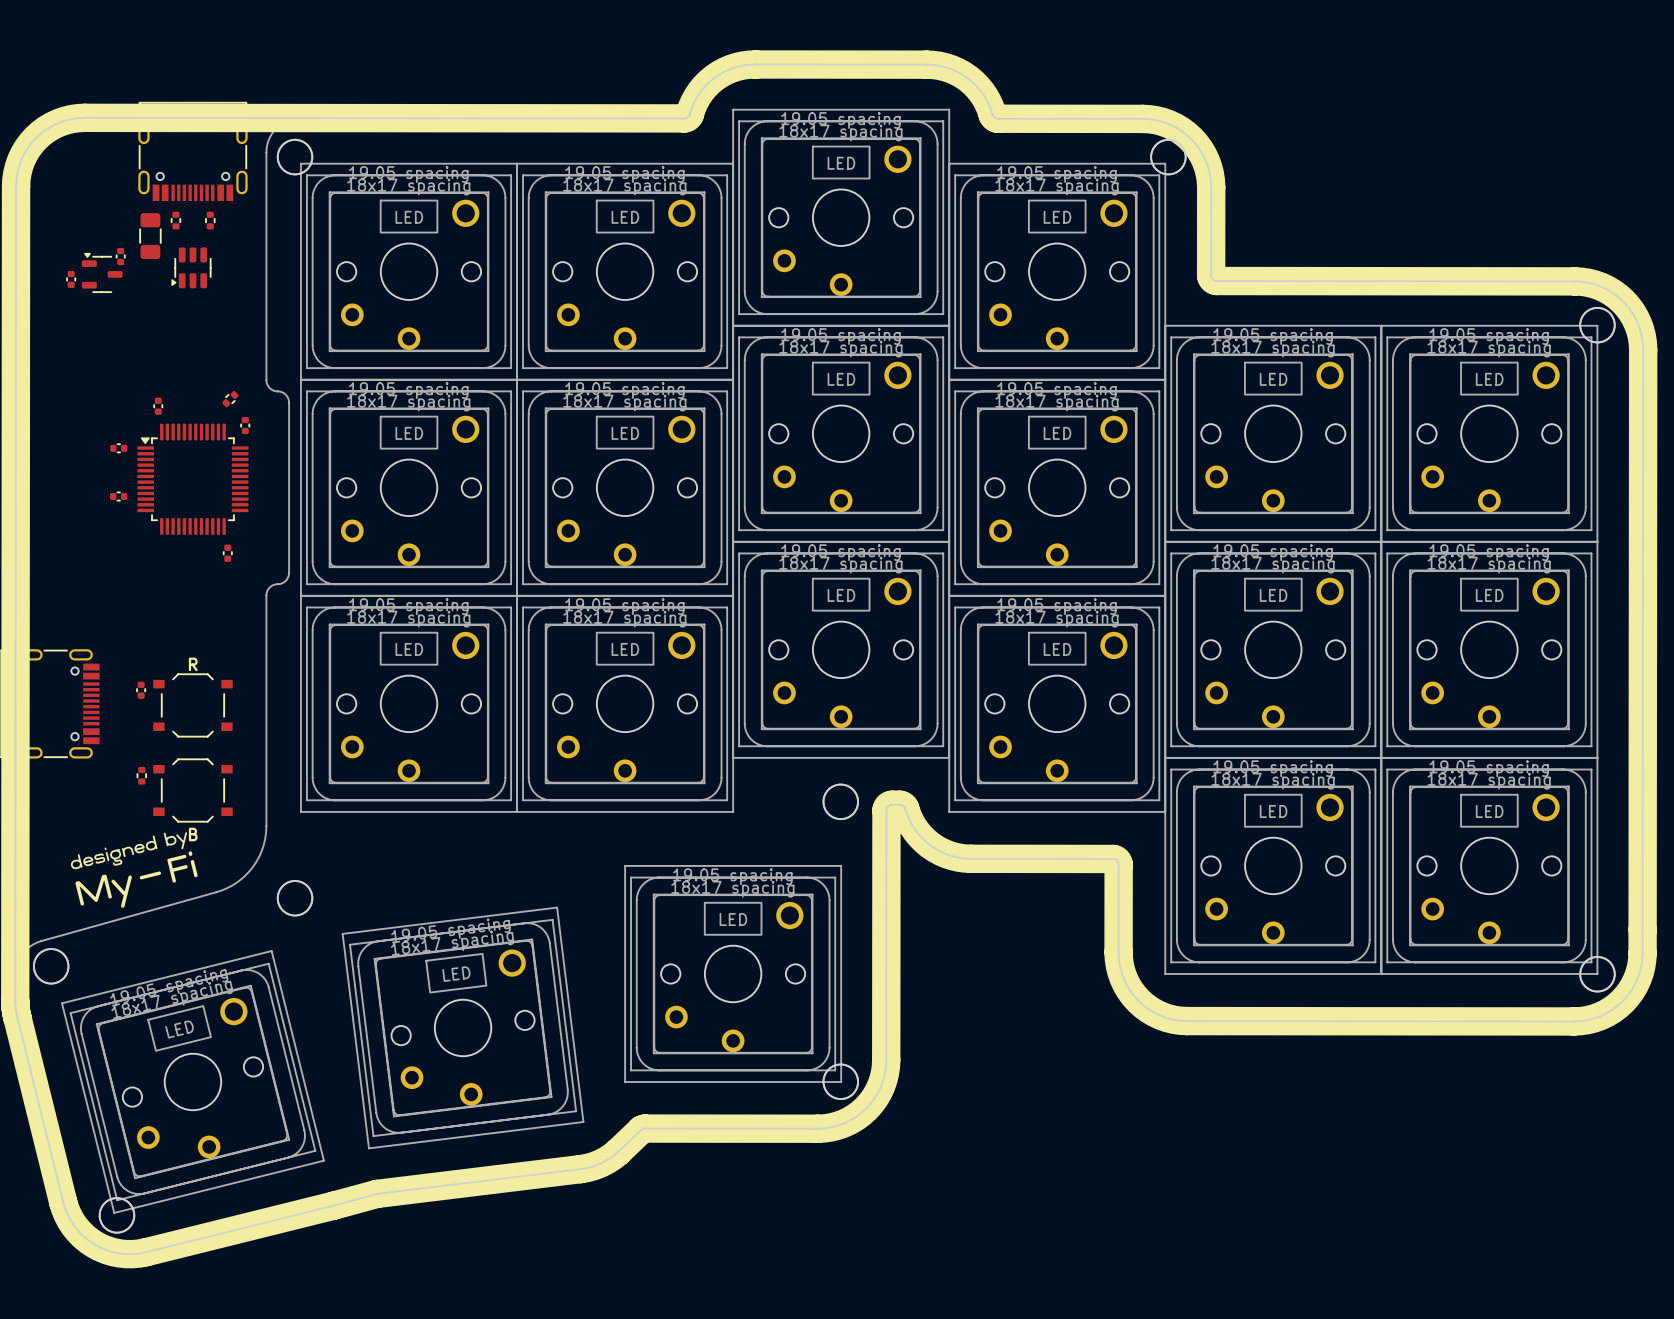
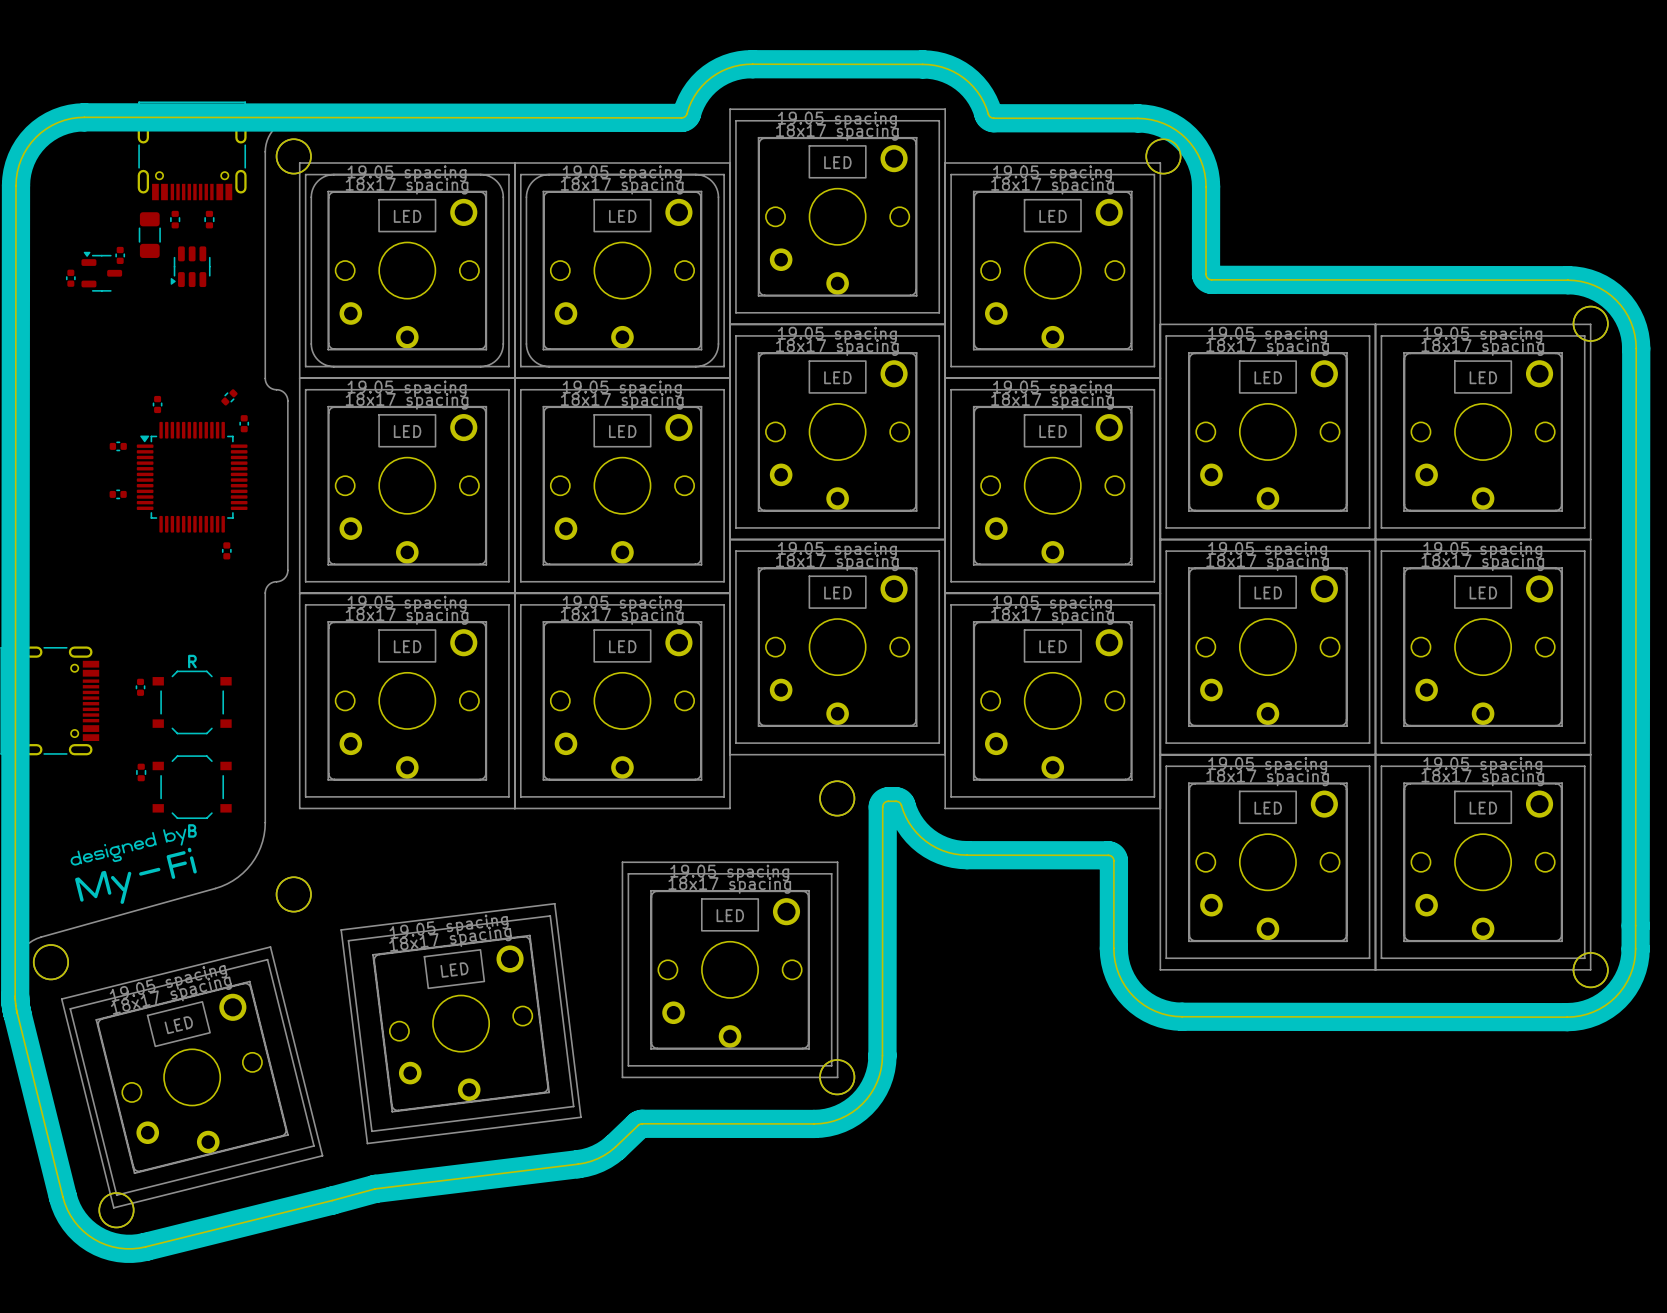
line: (767, 121) (914, 121) (926, 124) (932, 130) (937, 143) (937, 291) (935, 300) (928, 309) (914, 314) (767, 314) (757, 311) (749, 305) (744, 291) (744, 141) (748, 131) (753, 126) (767, 121) -> none
line: (983, 175) (1130, 175) (1142, 178) (1148, 184) (1153, 198) (1153, 345) (1151, 354) (1144, 363) (1130, 368) (983, 368) (973, 365) (965, 359) (960, 345) (960, 195) (967, 181) (973, 177) (983, 175) -> none
line: (767, 337) (914, 337) (926, 340) (932, 346) (937, 360) (937, 507) (935, 516) (928, 525) (914, 530) (767, 530) (757, 527) (749, 521) (744, 507) (744, 357) (751, 344) (757, 339) (767, 337) -> none
line: (1199, 337) (1347, 337) (1358, 340) (1365, 346) (1369, 360) (1369, 507) (1367, 516) (1360, 525) (1347, 530) (1199, 530) (1189, 527) (1181, 521) (1176, 507) (1177, 357) (1183, 344) (1189, 339) (1199, 337) -> none
line: (1415, 337) (1563, 337) (1574, 340) (1581, 346) (1585, 360) (1585, 507) (1582, 518) (1576, 525) (1563, 530) (1415, 530) (1405, 527) (1397, 521) (1392, 507) (1393, 357) (1399, 344) (1405, 339) (1415, 337) -> none
line: (335, 391) (482, 391) (491, 393) (500, 400) (505, 414) (505, 561) (503, 570) (496, 579) (482, 584) (335, 584) (325, 581) (317, 575) (312, 561) (312, 411) (316, 402) (321, 396) (335, 391) -> none
line: (551, 391) (698, 391) (710, 394) (716, 400) (721, 414) (721, 561) (718, 572) (712, 579) (698, 584) (551, 584) (541, 581) (533, 575) (528, 561) (528, 411) (535, 398) (541, 393) (551, 391) -> none
line: (983, 391) (1130, 391) (1142, 394) (1148, 400) (1153, 414) (1153, 561) (1150, 572) (1144, 579) (1130, 584) (983, 584) (973, 581) (965, 575) (960, 561) (960, 411) (967, 398) (973, 393) (983, 391) -> none
line: (767, 553) (914, 553) (923, 555) (932, 562) (937, 576) (937, 723) (934, 734) (928, 741) (914, 746) (767, 746) (757, 744) (749, 737) (744, 723) (744, 573) (748, 564) (753, 558) (767, 553) -> none
line: (1199, 553) (1347, 553) (1355, 555) (1365, 562) (1369, 576) (1369, 723) (1367, 732) (1360, 741) (1347, 746) (1199, 746) (1189, 744) (1181, 737) (1176, 723) (1177, 573) (1183, 560) (1189, 555) (1199, 553) -> none
line: (1415, 553) (1563, 553) (1571, 555) (1581, 562) (1585, 576) (1585, 723) (1582, 734) (1576, 741) (1563, 746) (1415, 746) (1405, 744) (1397, 737) (1392, 723) (1393, 573) (1396, 564) (1401, 558) (1415, 553) -> none
line: (335, 607) (482, 607) (491, 609) (500, 616) (505, 630) (505, 777) (503, 786) (496, 795) (482, 800) (335, 800) (325, 798) (317, 791) (312, 777) (312, 627) (319, 614) (325, 609) (335, 607) -> none
line: (551, 607) (698, 607) (707, 609) (716, 616) (721, 630) (721, 777) (718, 788) (712, 795) (698, 800) (551, 800) (541, 798) (533, 791) (528, 777) (528, 627) (535, 614) (541, 609) (551, 607) -> none
line: (983, 607) (1130, 607) (1142, 610) (1148, 616) (1153, 630) (1153, 777) (1150, 788) (1144, 795) (1130, 800) (983, 800) (973, 798) (965, 791) (960, 777) (960, 627) (967, 614) (973, 609) (983, 607) -> none
line: (1199, 769) (1347, 769) (1355, 771) (1365, 778) (1369, 792) (1369, 939) (1367, 948) (1360, 957) (1347, 962) (1199, 962) (1189, 960) (1181, 953) (1176, 939) (1177, 789) (1179, 782) (1185, 774) (1199, 769) -> none
line: (1415, 769) (1563, 769) (1574, 772) (1581, 778) (1585, 792) (1585, 939) (1584, 948) (1576, 957) (1563, 962) (1415, 962) (1405, 960) (1397, 953) (1392, 939) (1393, 789) (1396, 780) (1401, 774) (1415, 769) -> none
line: (659, 877) (806, 877) (818, 880) (824, 886) (829, 900) (829, 1047) (827, 1056) (820, 1065) (806, 1070) (659, 1070) (649, 1068) (641, 1061) (636, 1047) (636, 897) (643, 884) (649, 879) (659, 877) -> none
line: (524, 923) (378, 941) (368, 944) (361, 951) (358, 966) (376, 1112) (379, 1122) (386, 1129) (401, 1132) (547, 1114) (558, 1110) (564, 1103) (567, 1089) (549, 940) (541, 927) (533, 923) (524, 923) -> none
line: (241, 970) (98, 1006) (90, 1010) (82, 1019) (81, 1033) (117, 1176) (121, 1184) (130, 1192) (144, 1193) (287, 1157) (298, 1152) (303, 1144) (304, 1130) (267, 984) (262, 976) (255, 971) (241, 970) -> none

